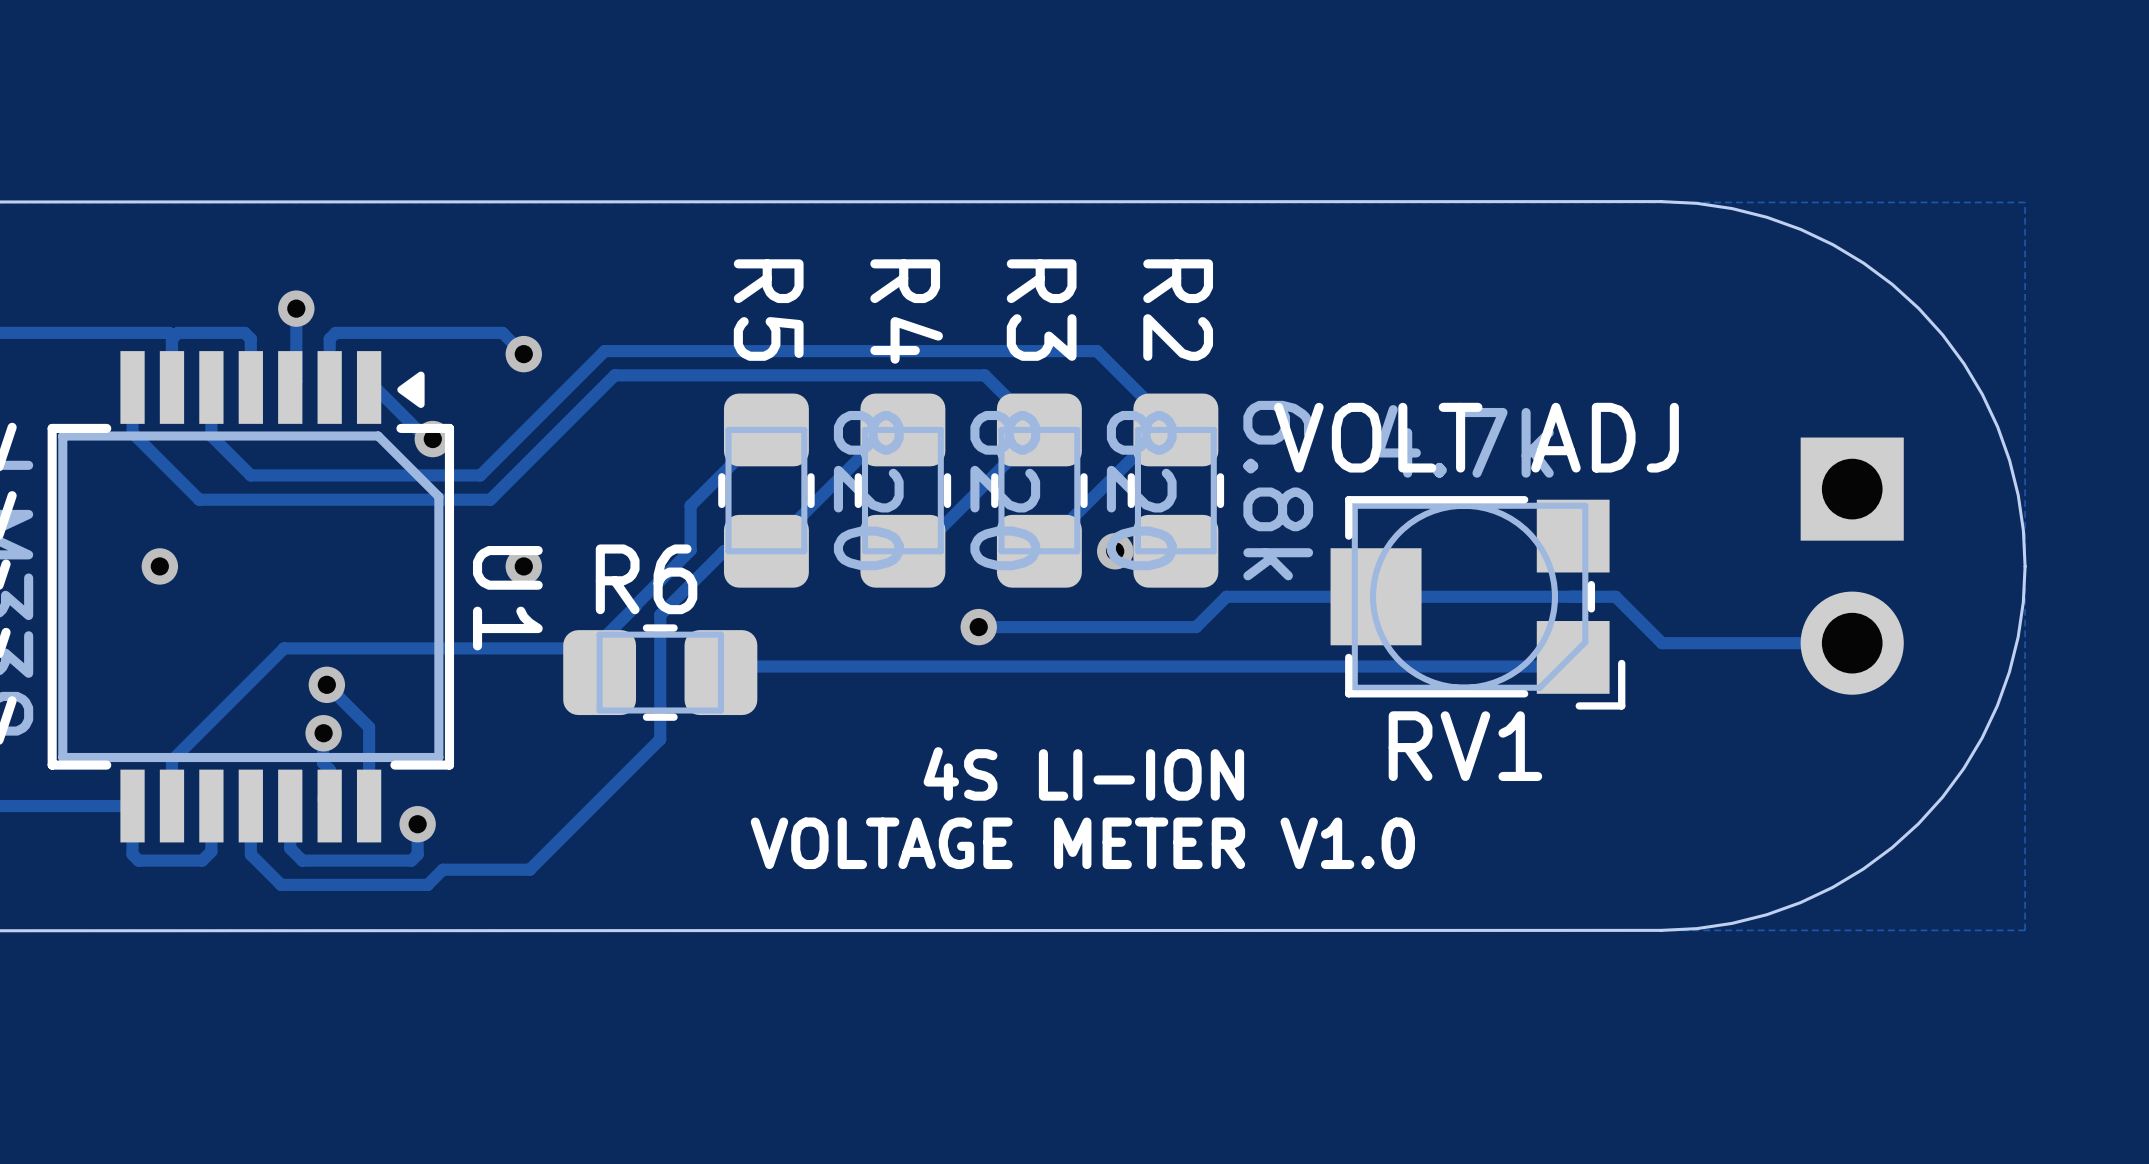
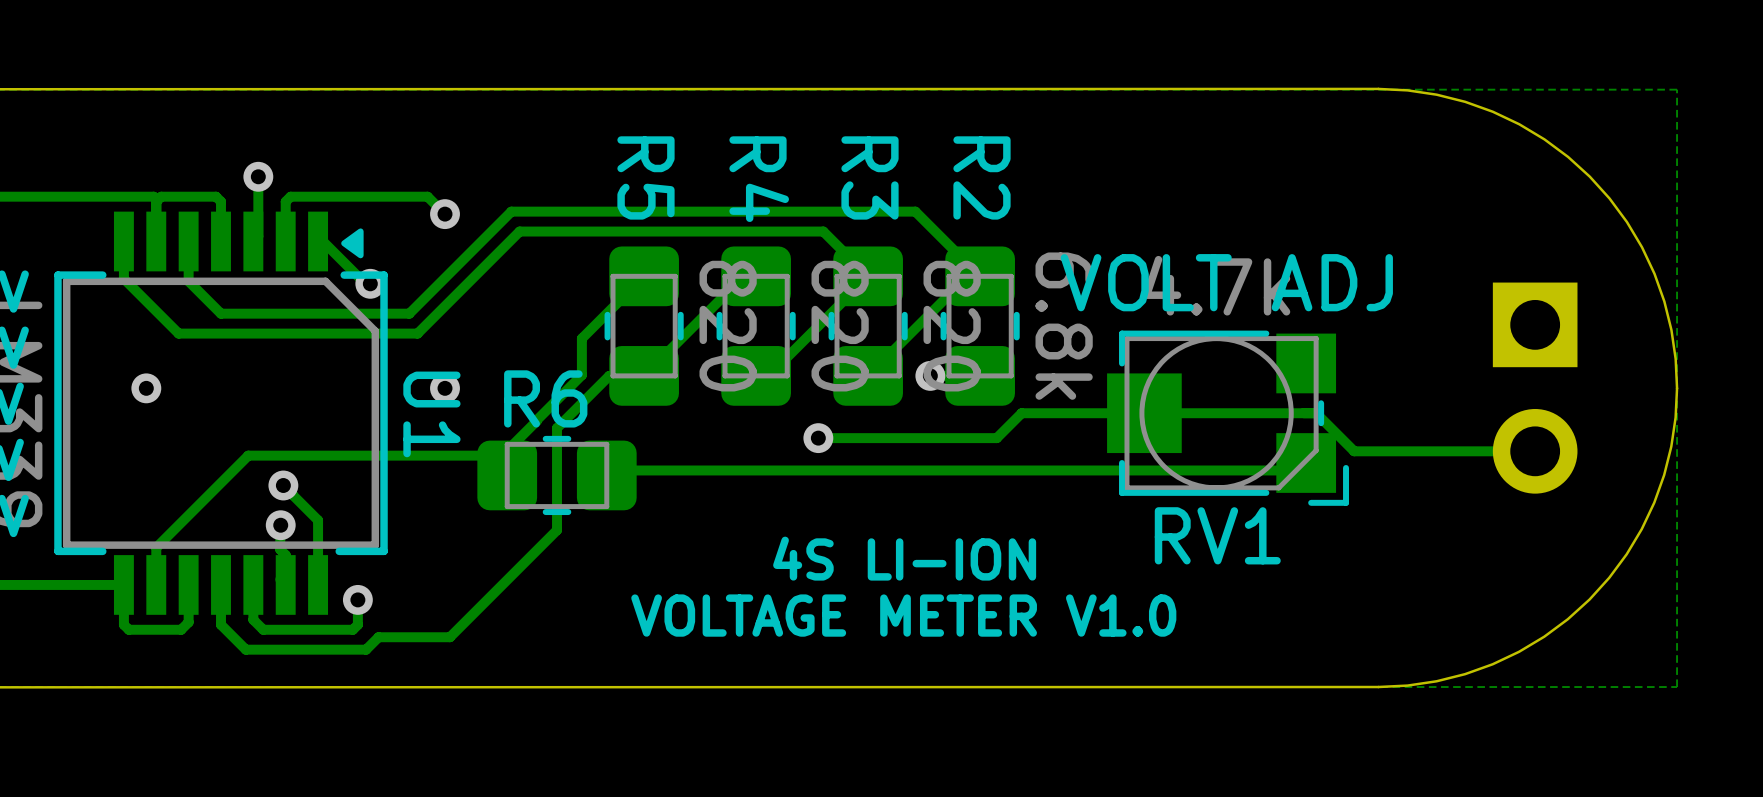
track: (1585, 596) (1615, 596) (1662, 643) -> (1316, 413) (1354, 451) (1379, 451)

